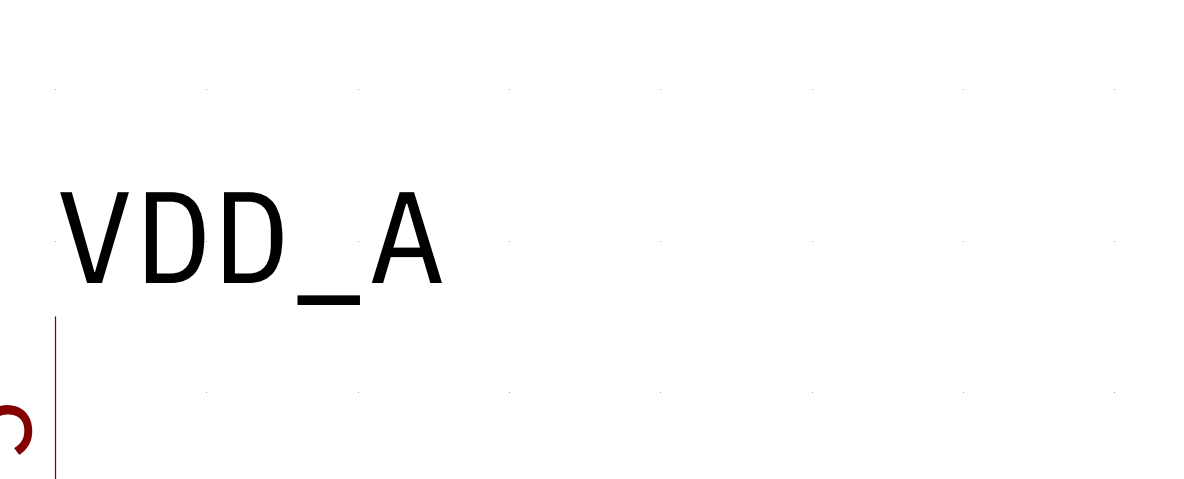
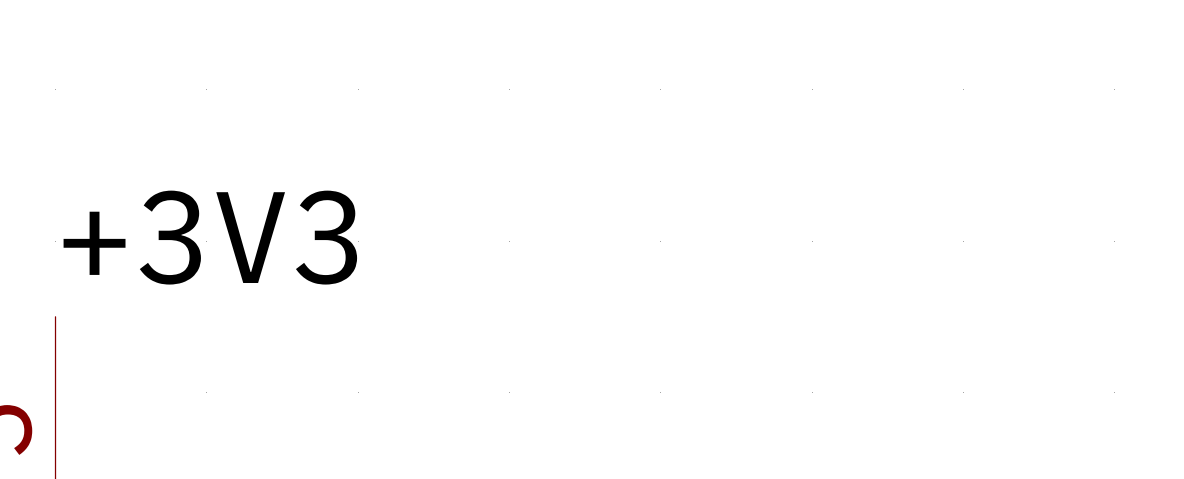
label: VDD_A (251, 248) -> +3V3 (210, 237)

